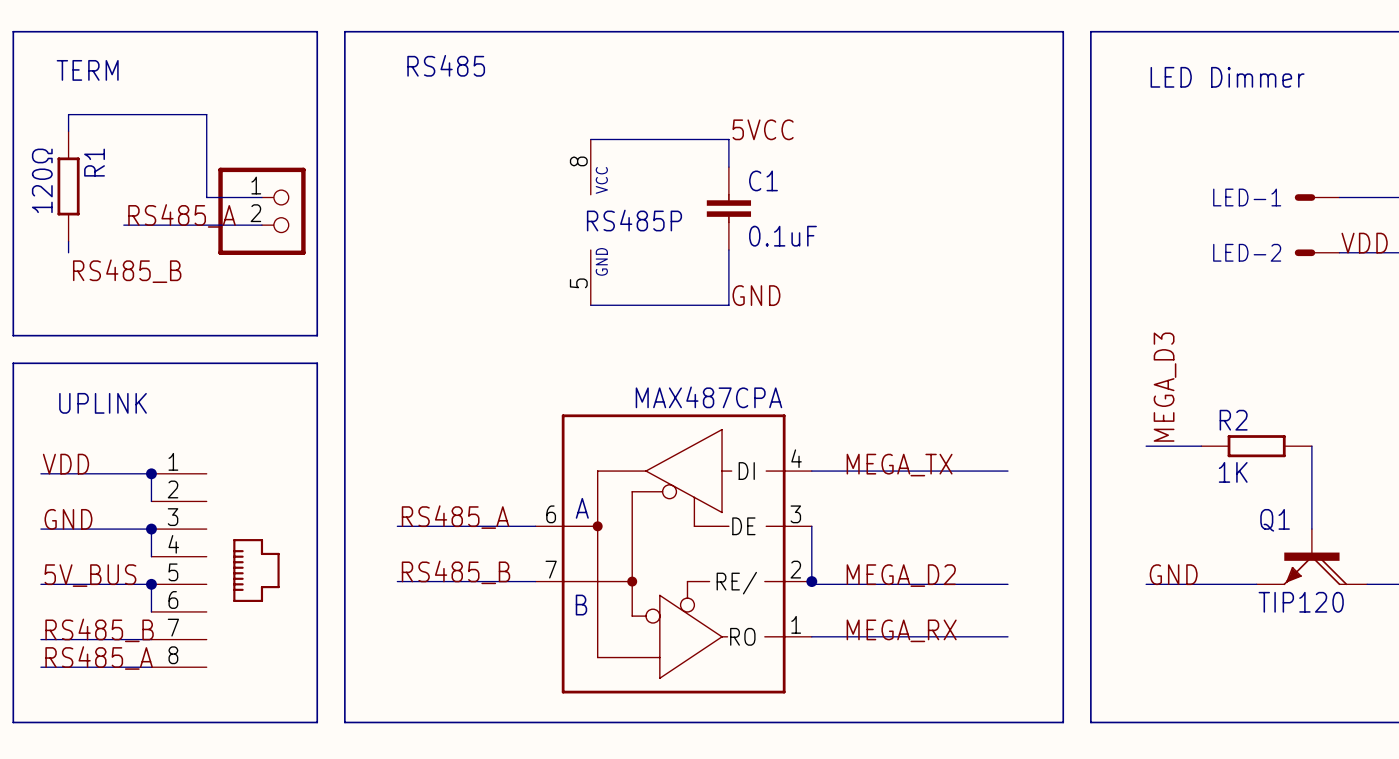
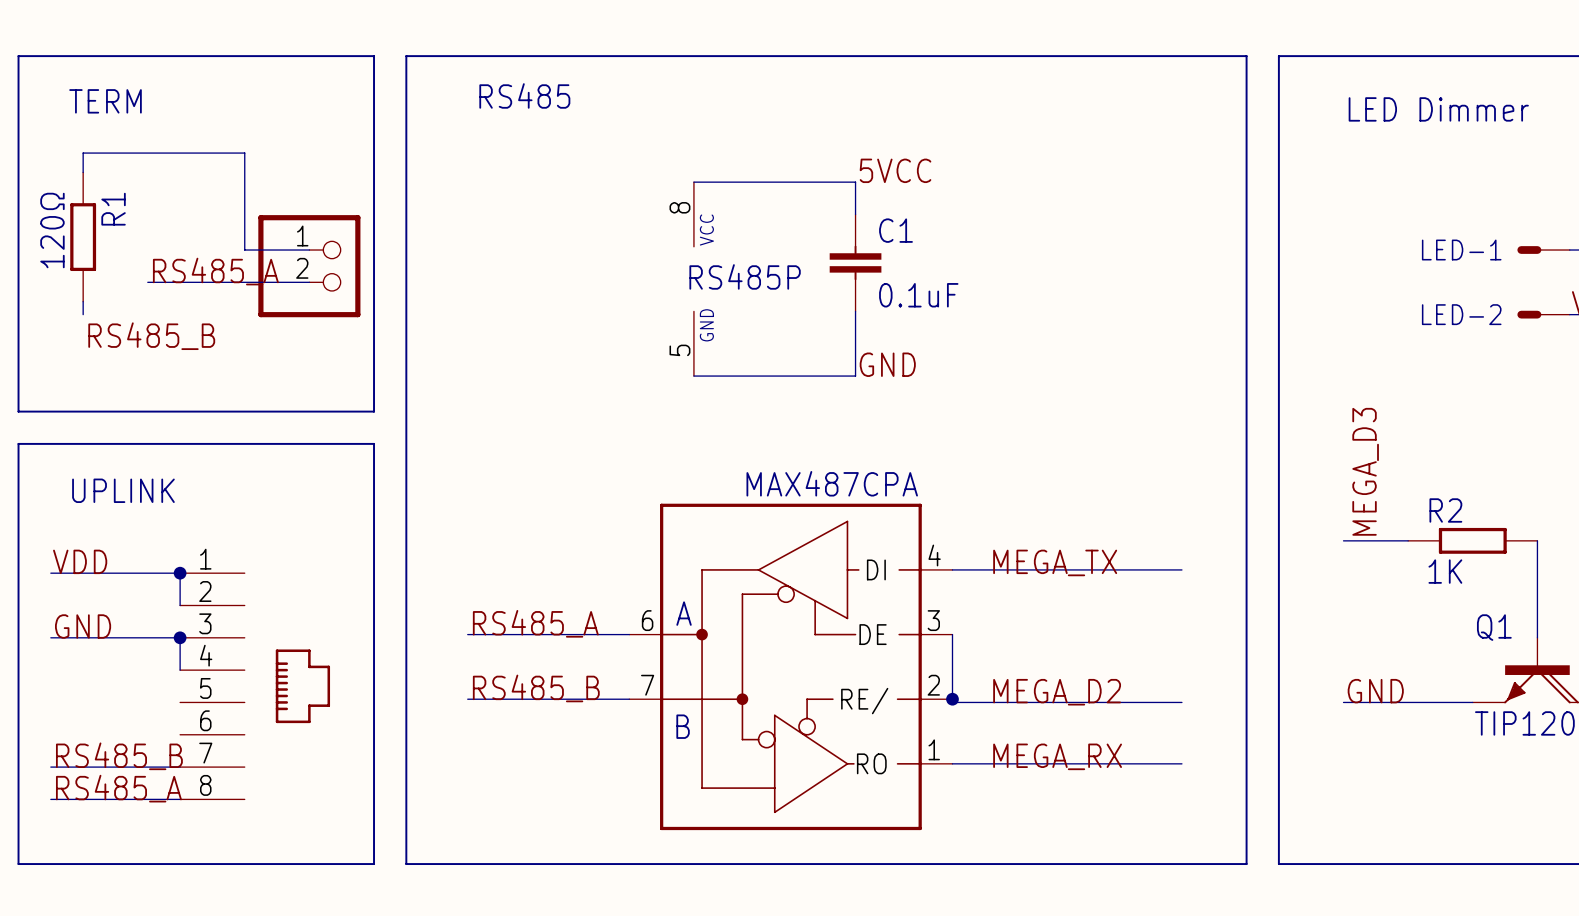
label: 5V_BUS (90, 575) -> none
wire: (40, 584) (151, 584) (151, 611) -> none
junction: (151, 584) -> none

